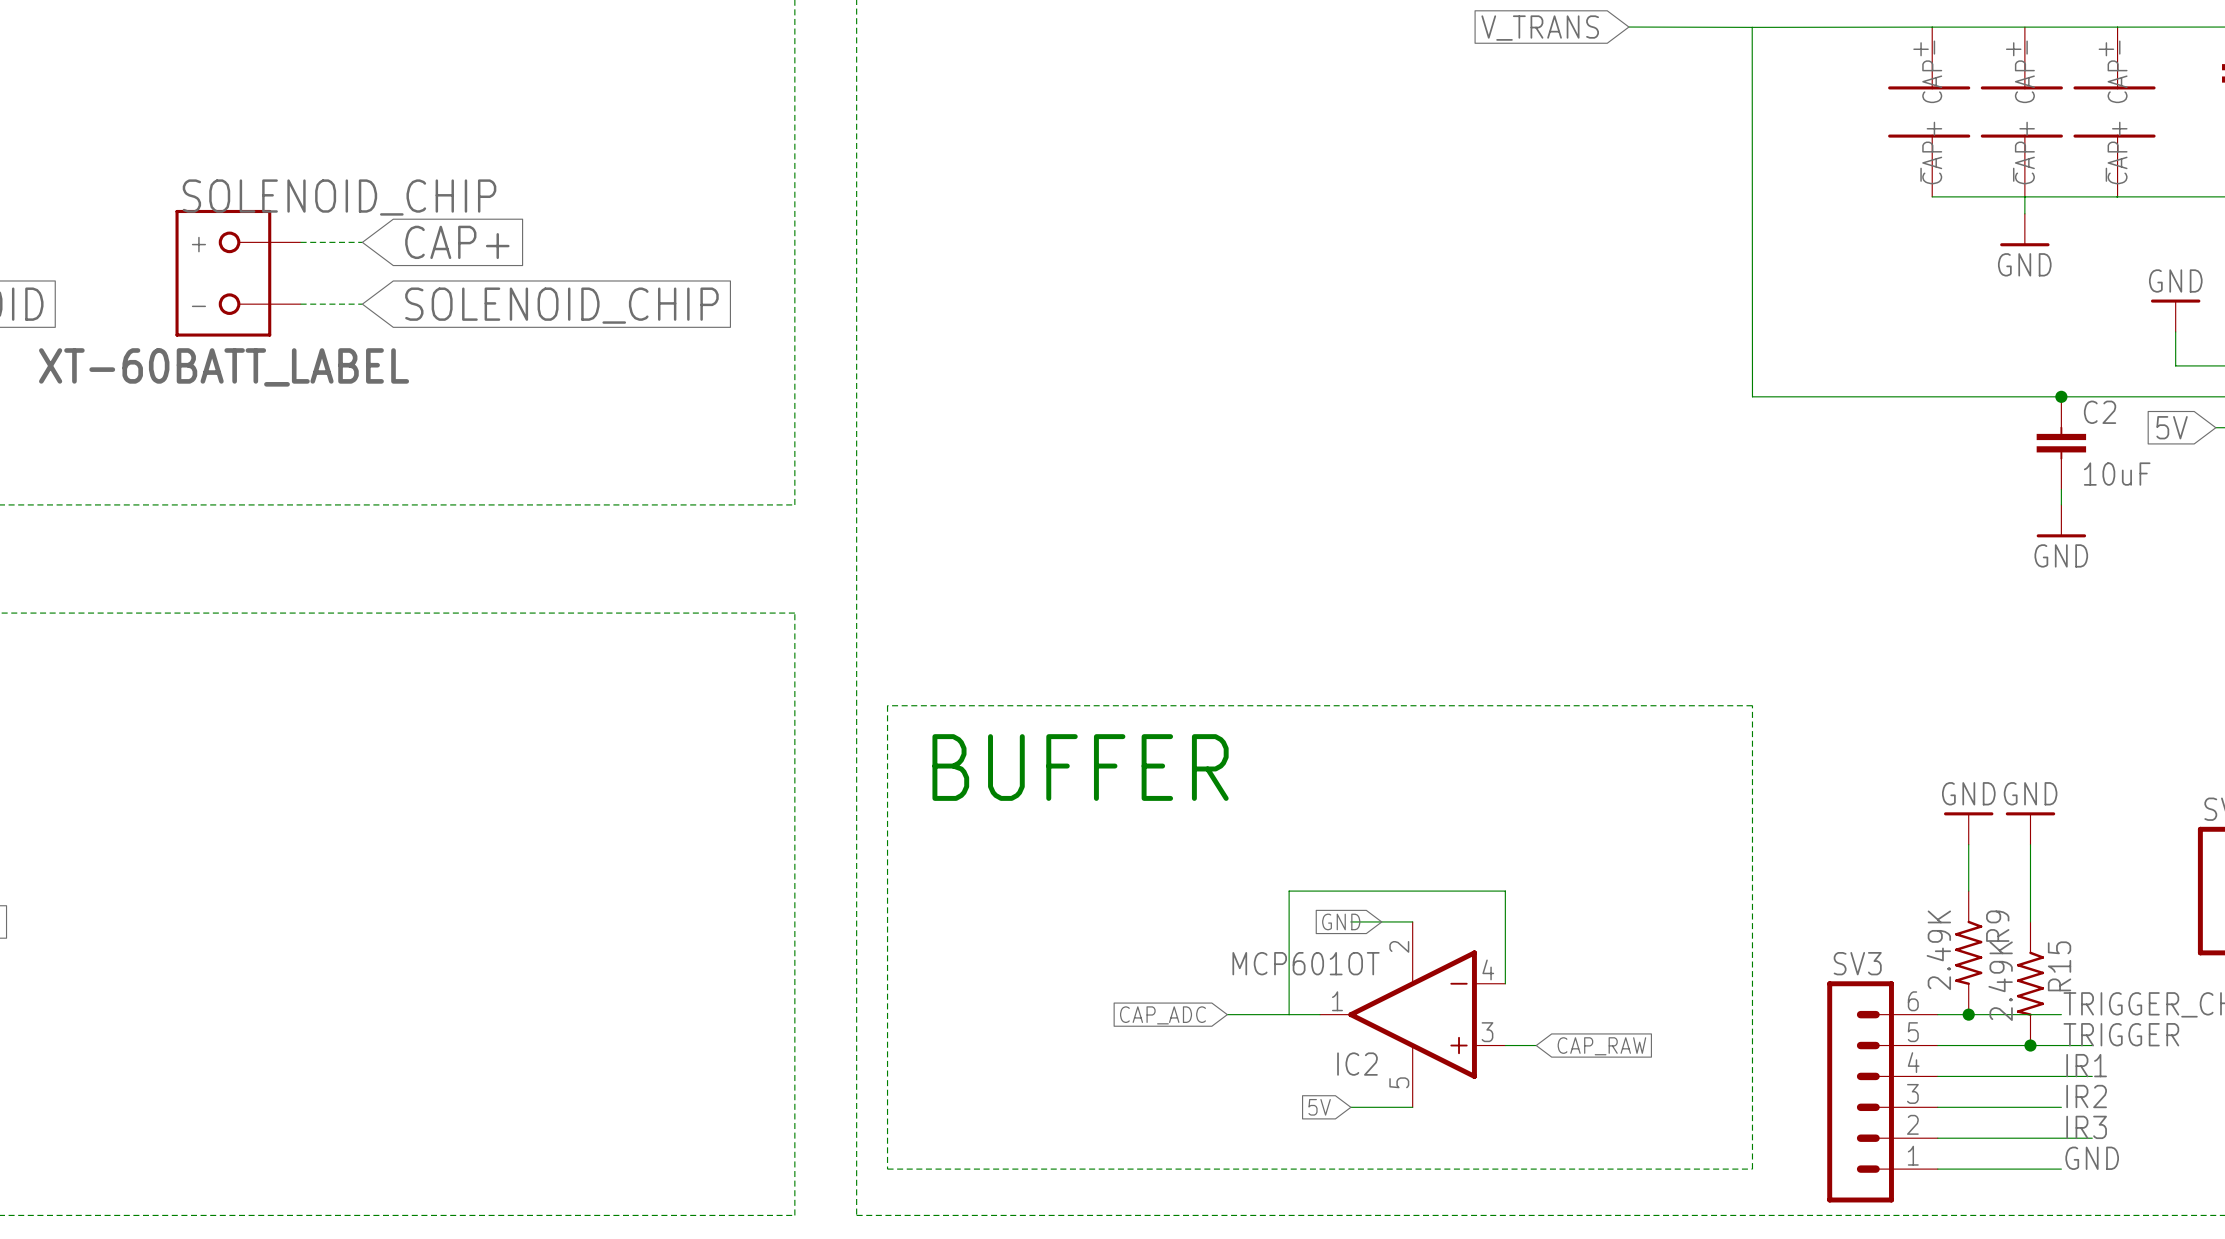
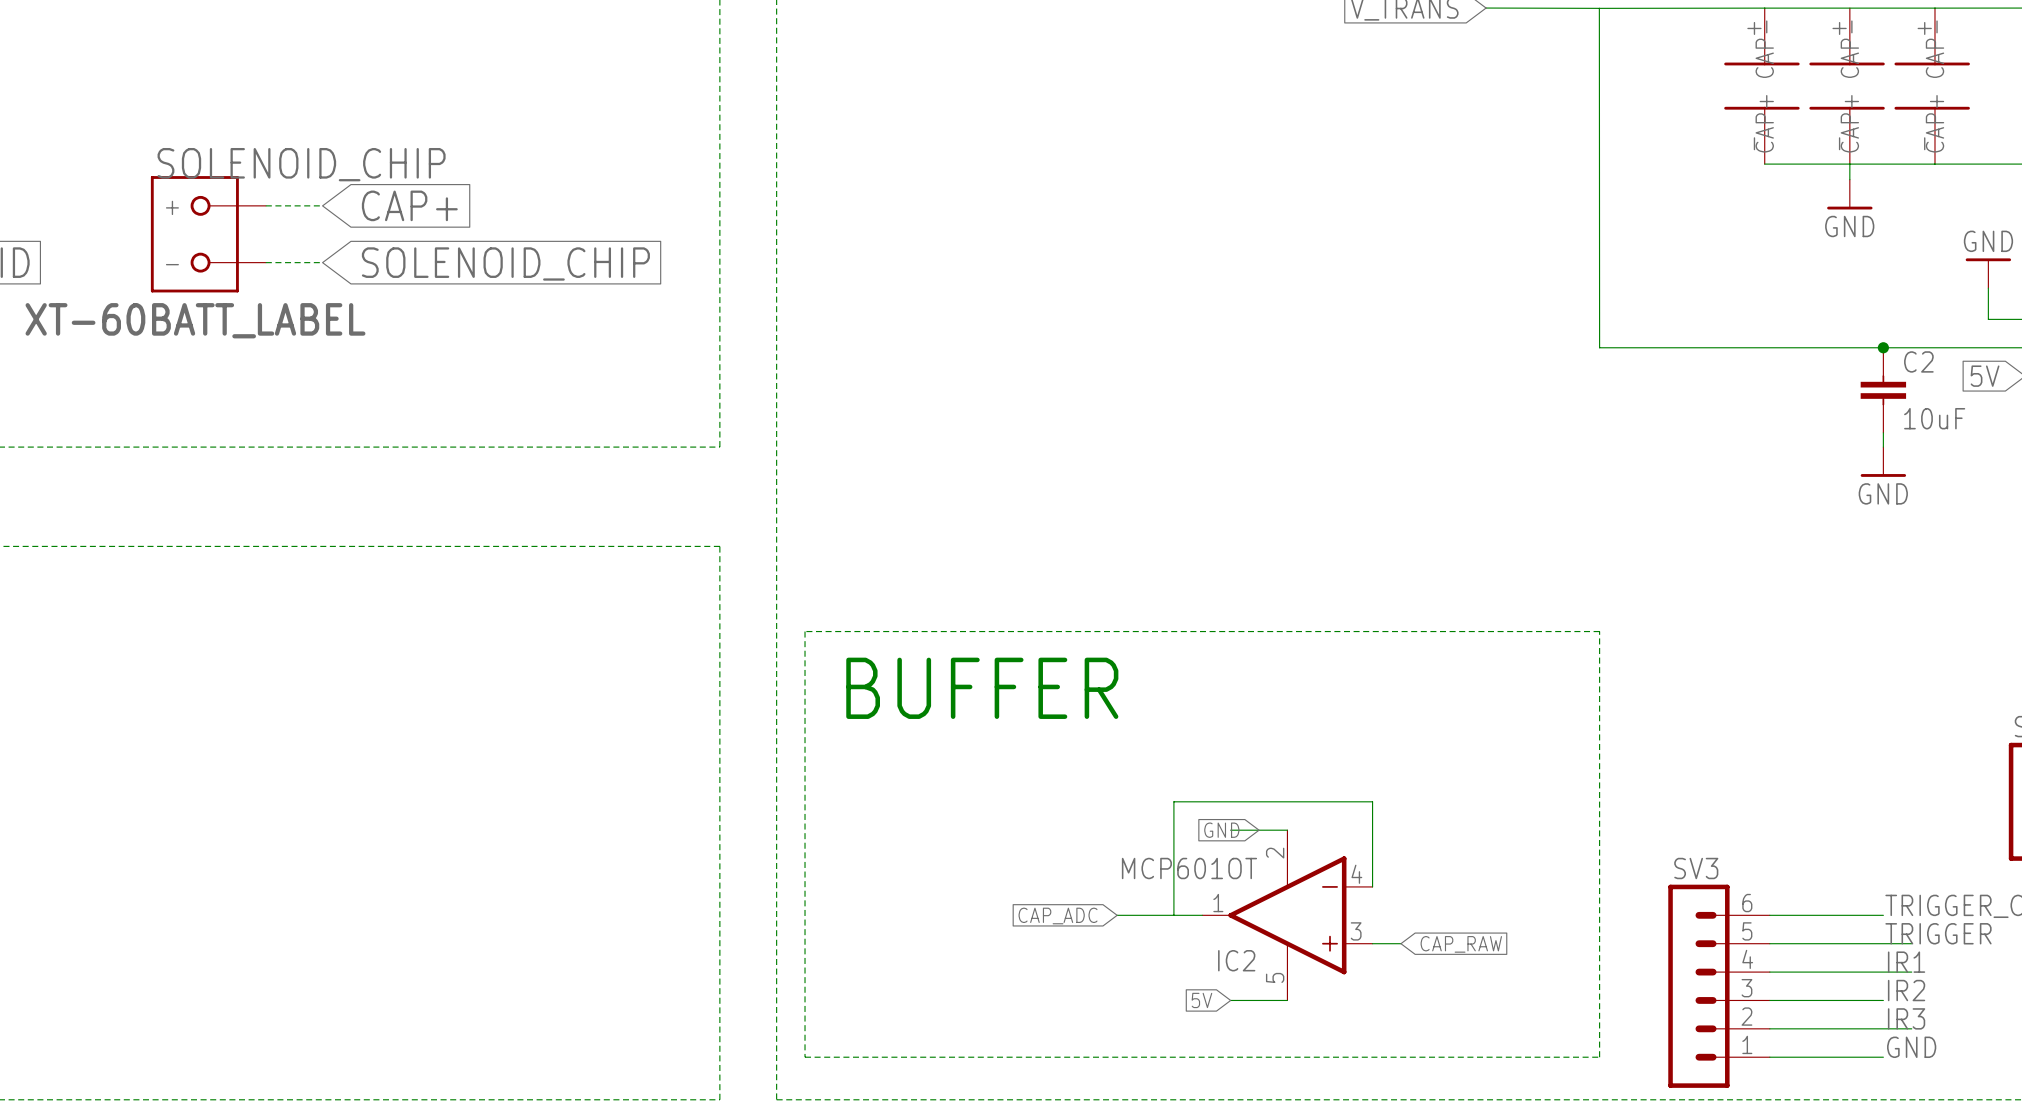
power symbol: GND (1968, 828) -> none
power symbol: GND (2030, 828) -> none
wire: (1968, 844) (1968, 891) -> none
wire: (2030, 844) (2030, 921) -> none
R9: 2.49K (1968, 952) -> none
R15: 2.49K (2030, 983) -> none
junction: (1968, 1014) -> none
junction: (2030, 1045) -> none

